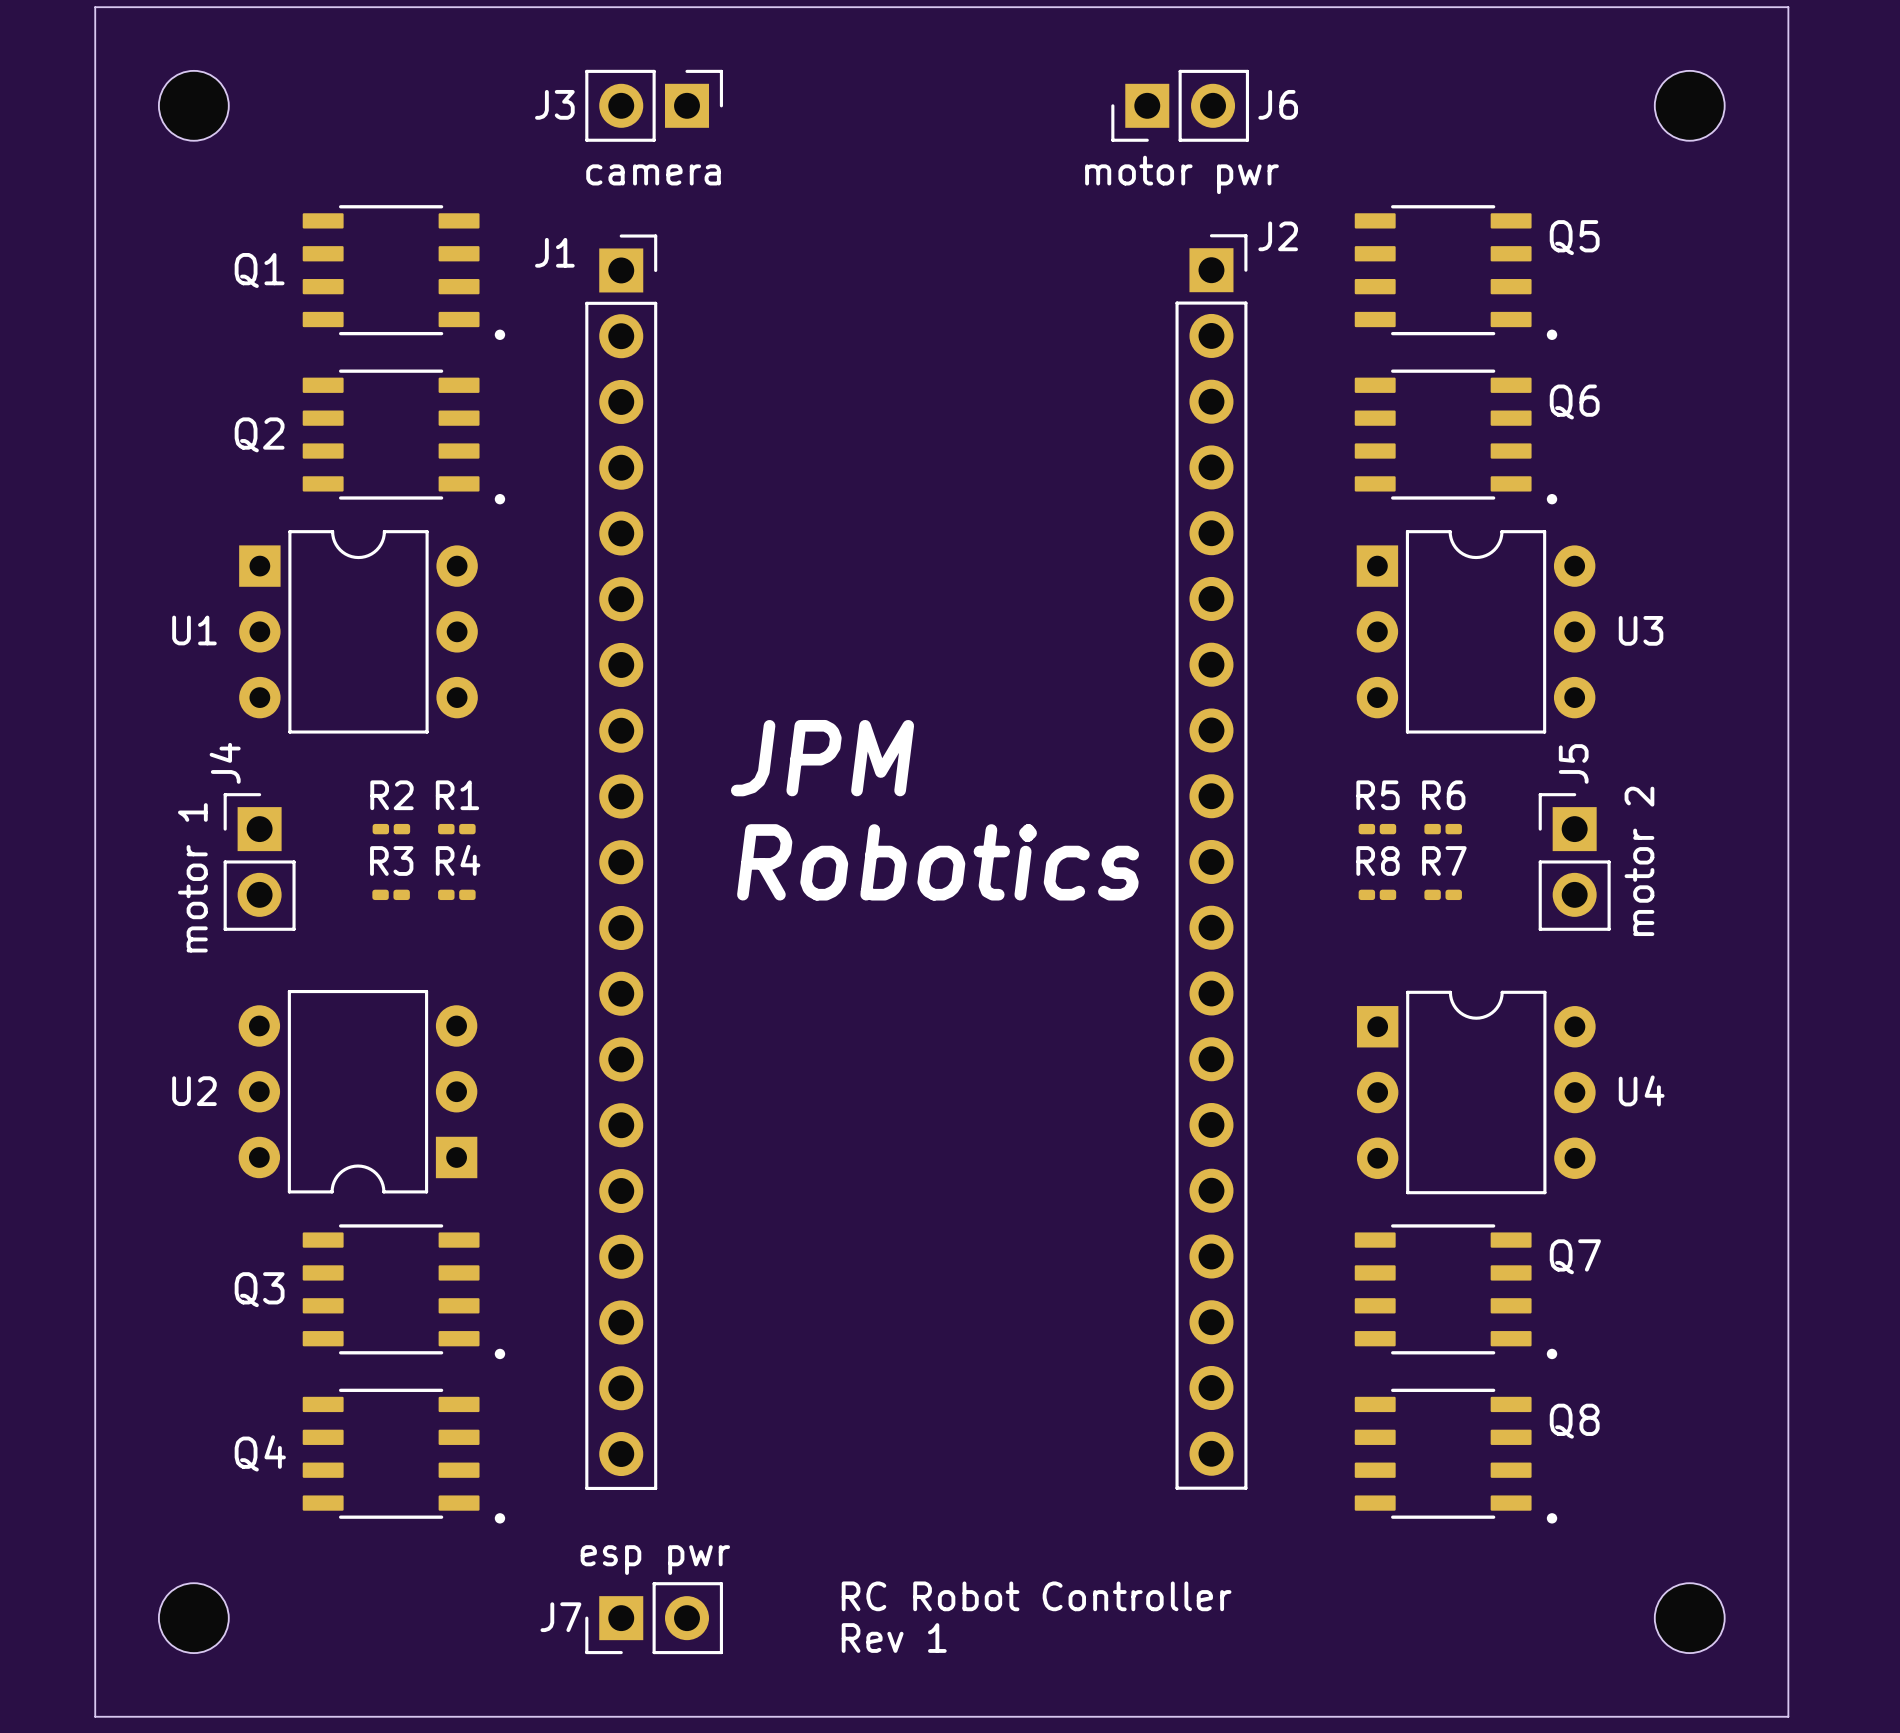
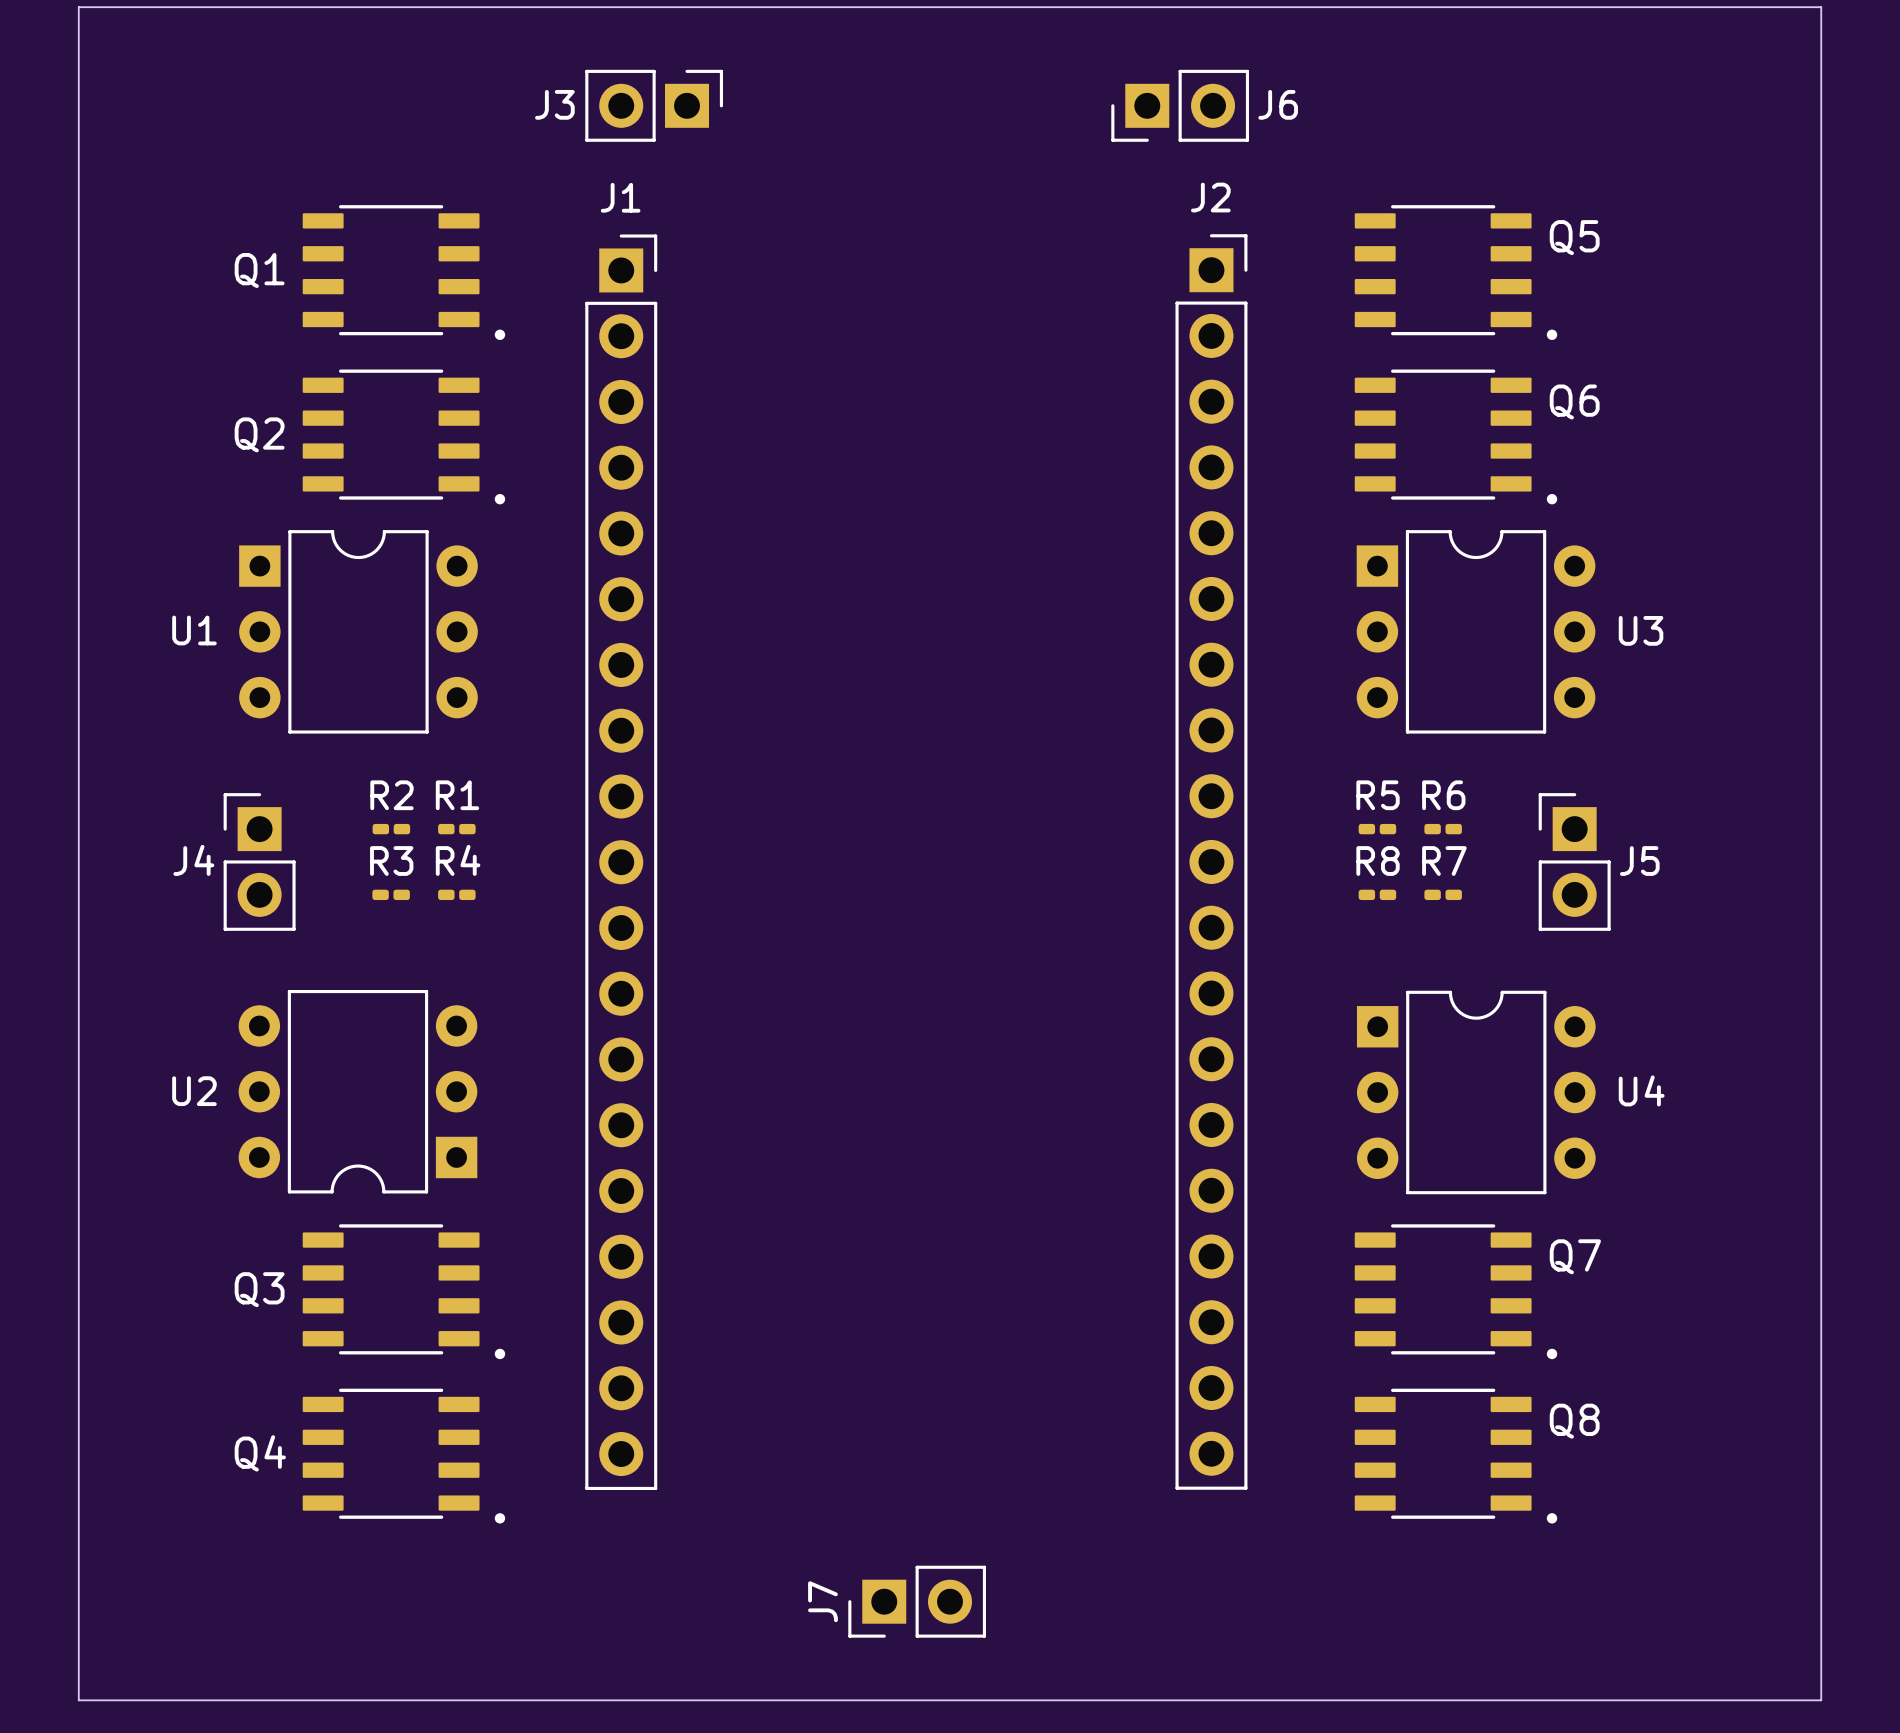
board edge: (95, 7) (95, 1716) (1788, 1716) (1788, 7) -> (95, 7) (78, 7) (78, 1700) (1821, 1700) (1821, 7) (1788, 7)
part: (193, 105) -> none
part: (1689, 105) -> none
text: camera (653, 174) -> none
text: motor pwr (1182, 174) -> none
J2 name position: J2 (1278, 236) -> J2 (1210, 197)
J1 name position: J1 (554, 252) -> J1 (620, 197)
text: JPM (822, 758) -> none
J4 name rotation: 0° (225, 763) -> 90° clockwise (193, 860)
J4 name position: J4 (225, 763) -> J4 (193, 860)
J5 name rotation: 0° (1573, 763) -> 90° clockwise (1639, 861)
J5 name position: J5 (1573, 763) -> J5 (1639, 861)
text: motor 2 (1639, 861) -> none
text: Robotics (938, 862) -> none
text: motor 1 (192, 877) -> none
text: esp pwr (655, 1560) -> none
text: RC Robot Controller (1036, 1596) -> none
J7 name rotation: 0° (560, 1617) -> 90° counterclockwise (822, 1601)
part: (193, 1618) -> none
J7 position: (654, 1618) -> (917, 1601)
part: (1689, 1618) -> none
text: Rev 1 (894, 1638) -> none

